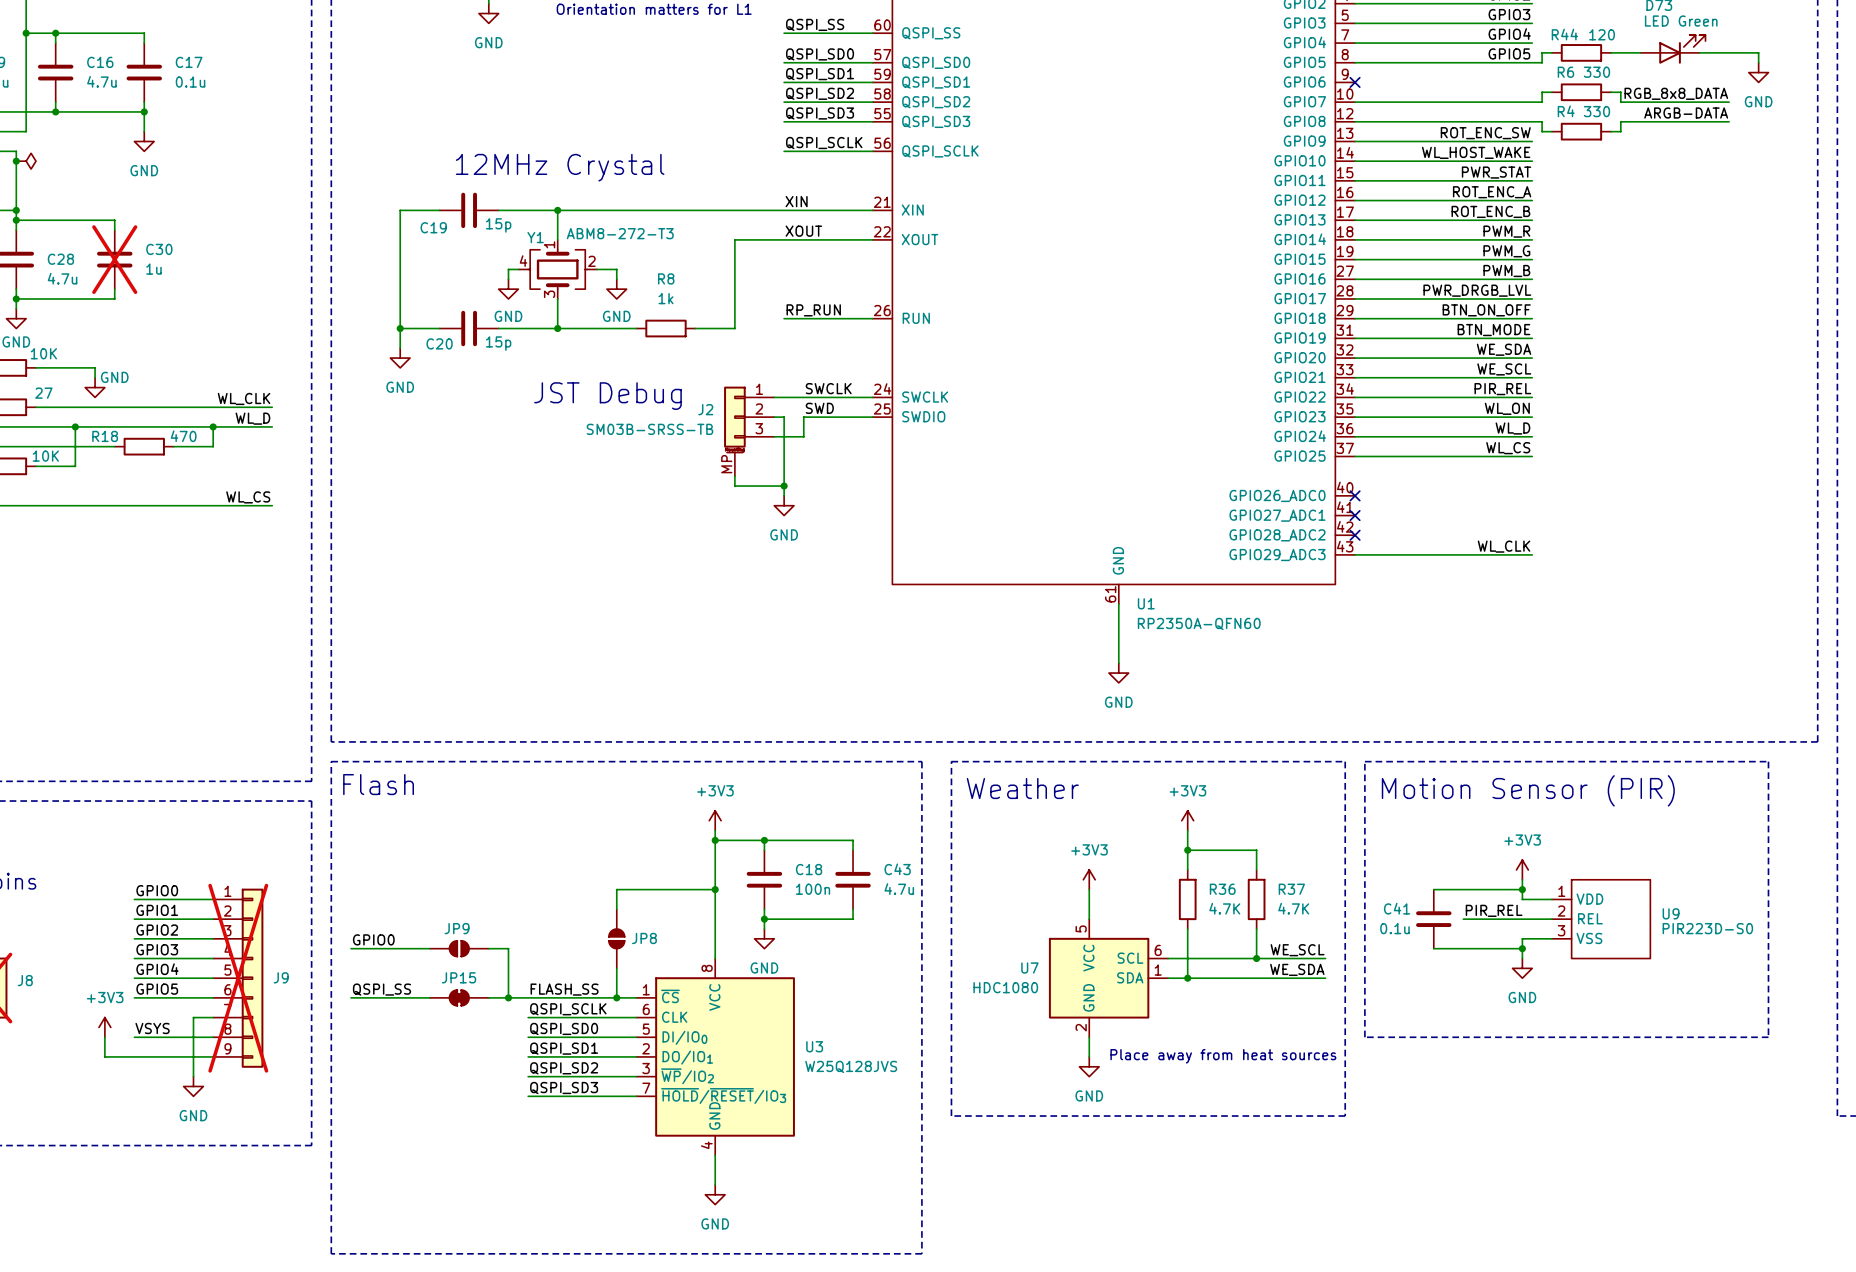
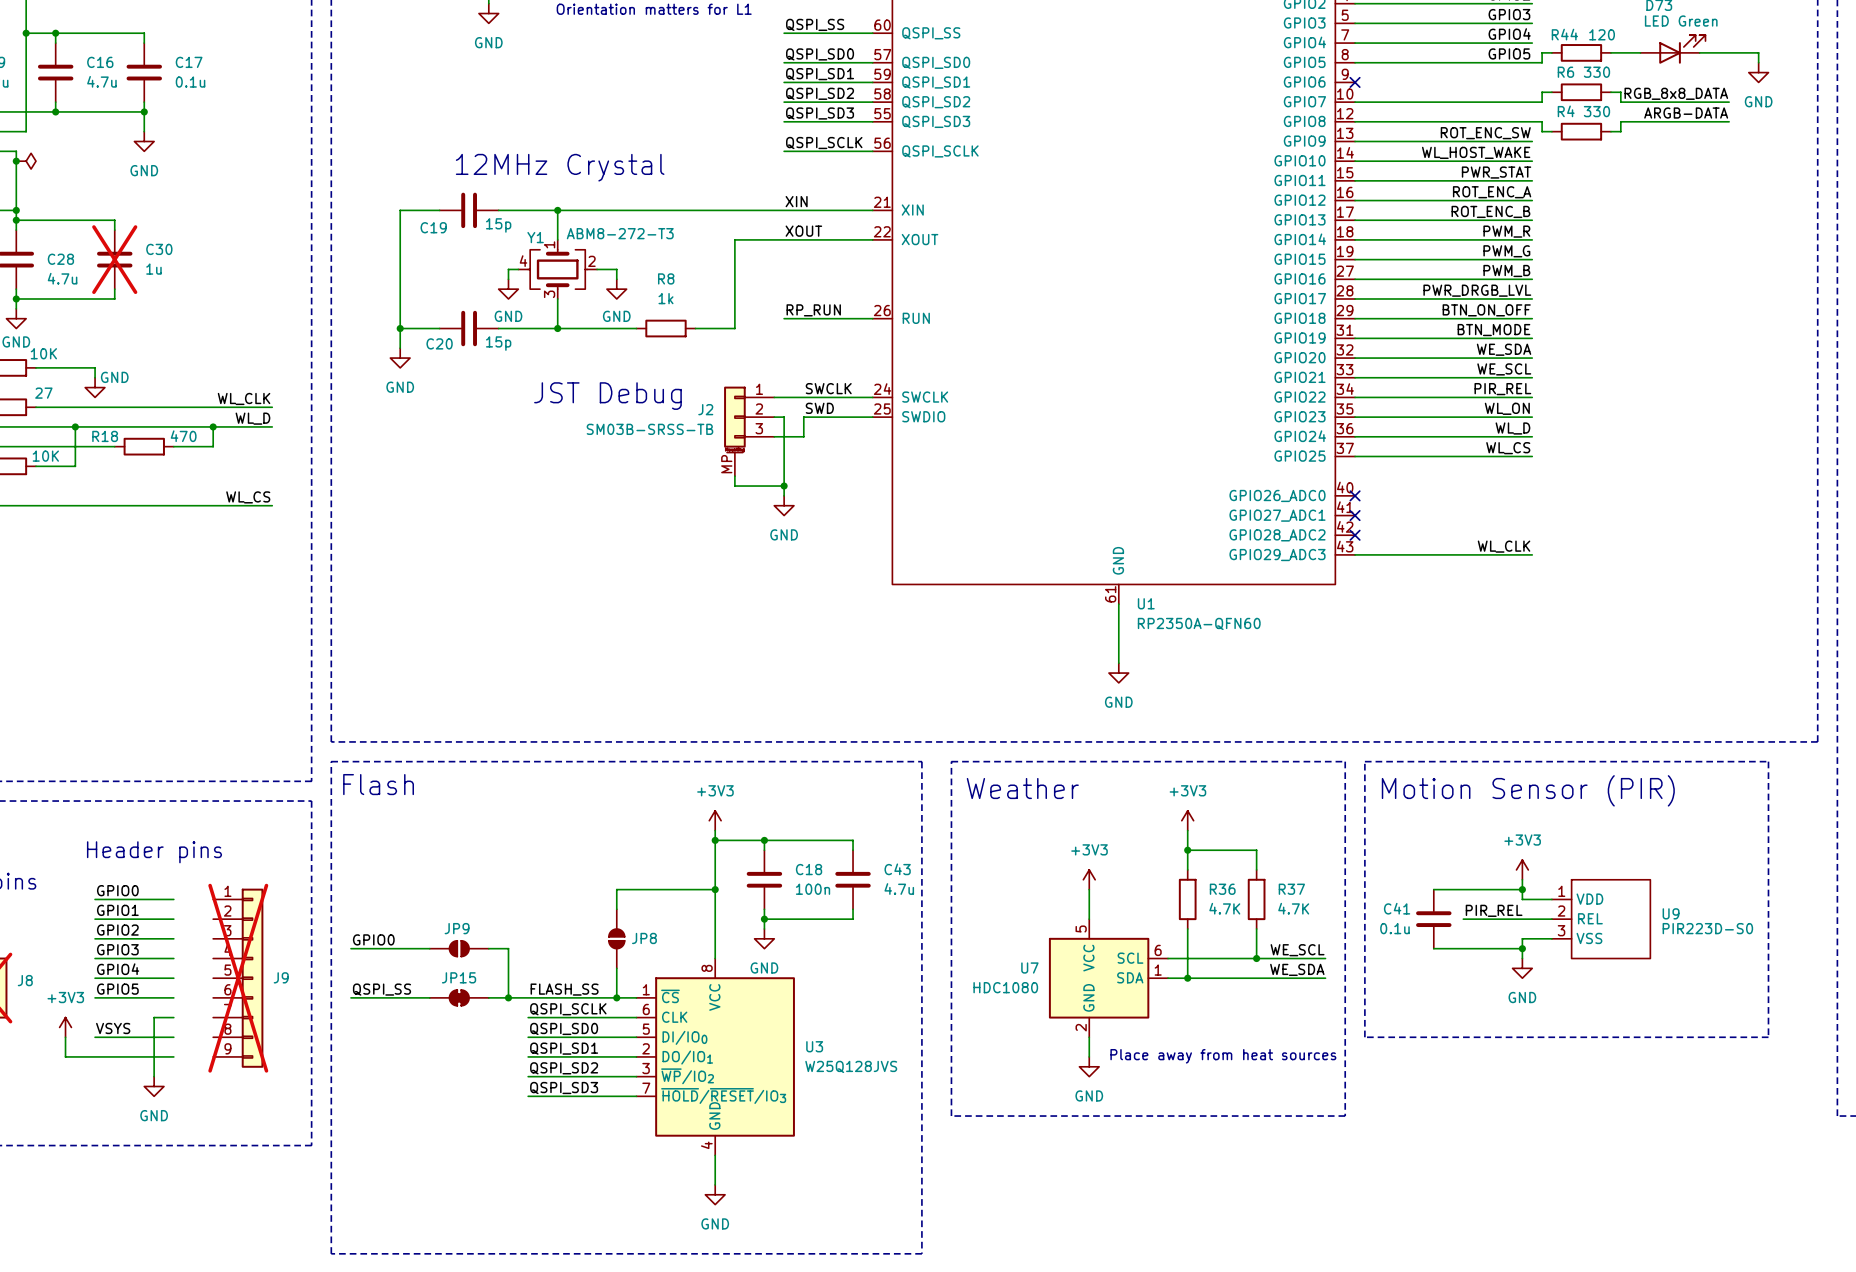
text: none -> Header pins (154, 852)
label position: GPIO0 (157, 890) -> GPIO0 (117, 890)
wire: (173, 899) (213, 899) -> (95, 899) (134, 899)
label position: GPIO1 (157, 910) -> GPIO1 (117, 910)
wire: (173, 919) (213, 919) -> (95, 919) (134, 919)
label position: GPIO2 (157, 930) -> GPIO2 (117, 930)
wire: (173, 938) (213, 938) -> (95, 938) (134, 938)
label position: GPIO3 (157, 949) -> GPIO3 (117, 949)
wire: (173, 958) (213, 958) -> (95, 958) (134, 958)
label position: GPIO4 (157, 969) -> GPIO4 (118, 969)
wire: (173, 978) (213, 978) -> (95, 978) (134, 978)
label position: GPIO5 (157, 989) -> GPIO5 (117, 989)
wire: (173, 997) (213, 997) -> (95, 997) (134, 997)
wire: (213, 1017) (193, 1017) (193, 1076) -> (173, 1017) (154, 1017) (154, 1076)
power symbol position: +3V3 (104, 1027) -> +3V3 (65, 1027)
label position: VSYS (152, 1028) -> VSYS (113, 1028)
wire: (104, 1037) (104, 1056) -> (65, 1037) (65, 1056) (104, 1056)
wire: (173, 1037) (213, 1037) -> (95, 1037) (134, 1037)
wire: (173, 1056) (213, 1056) -> none
power symbol position: GND (193, 1086) -> GND (154, 1086)

